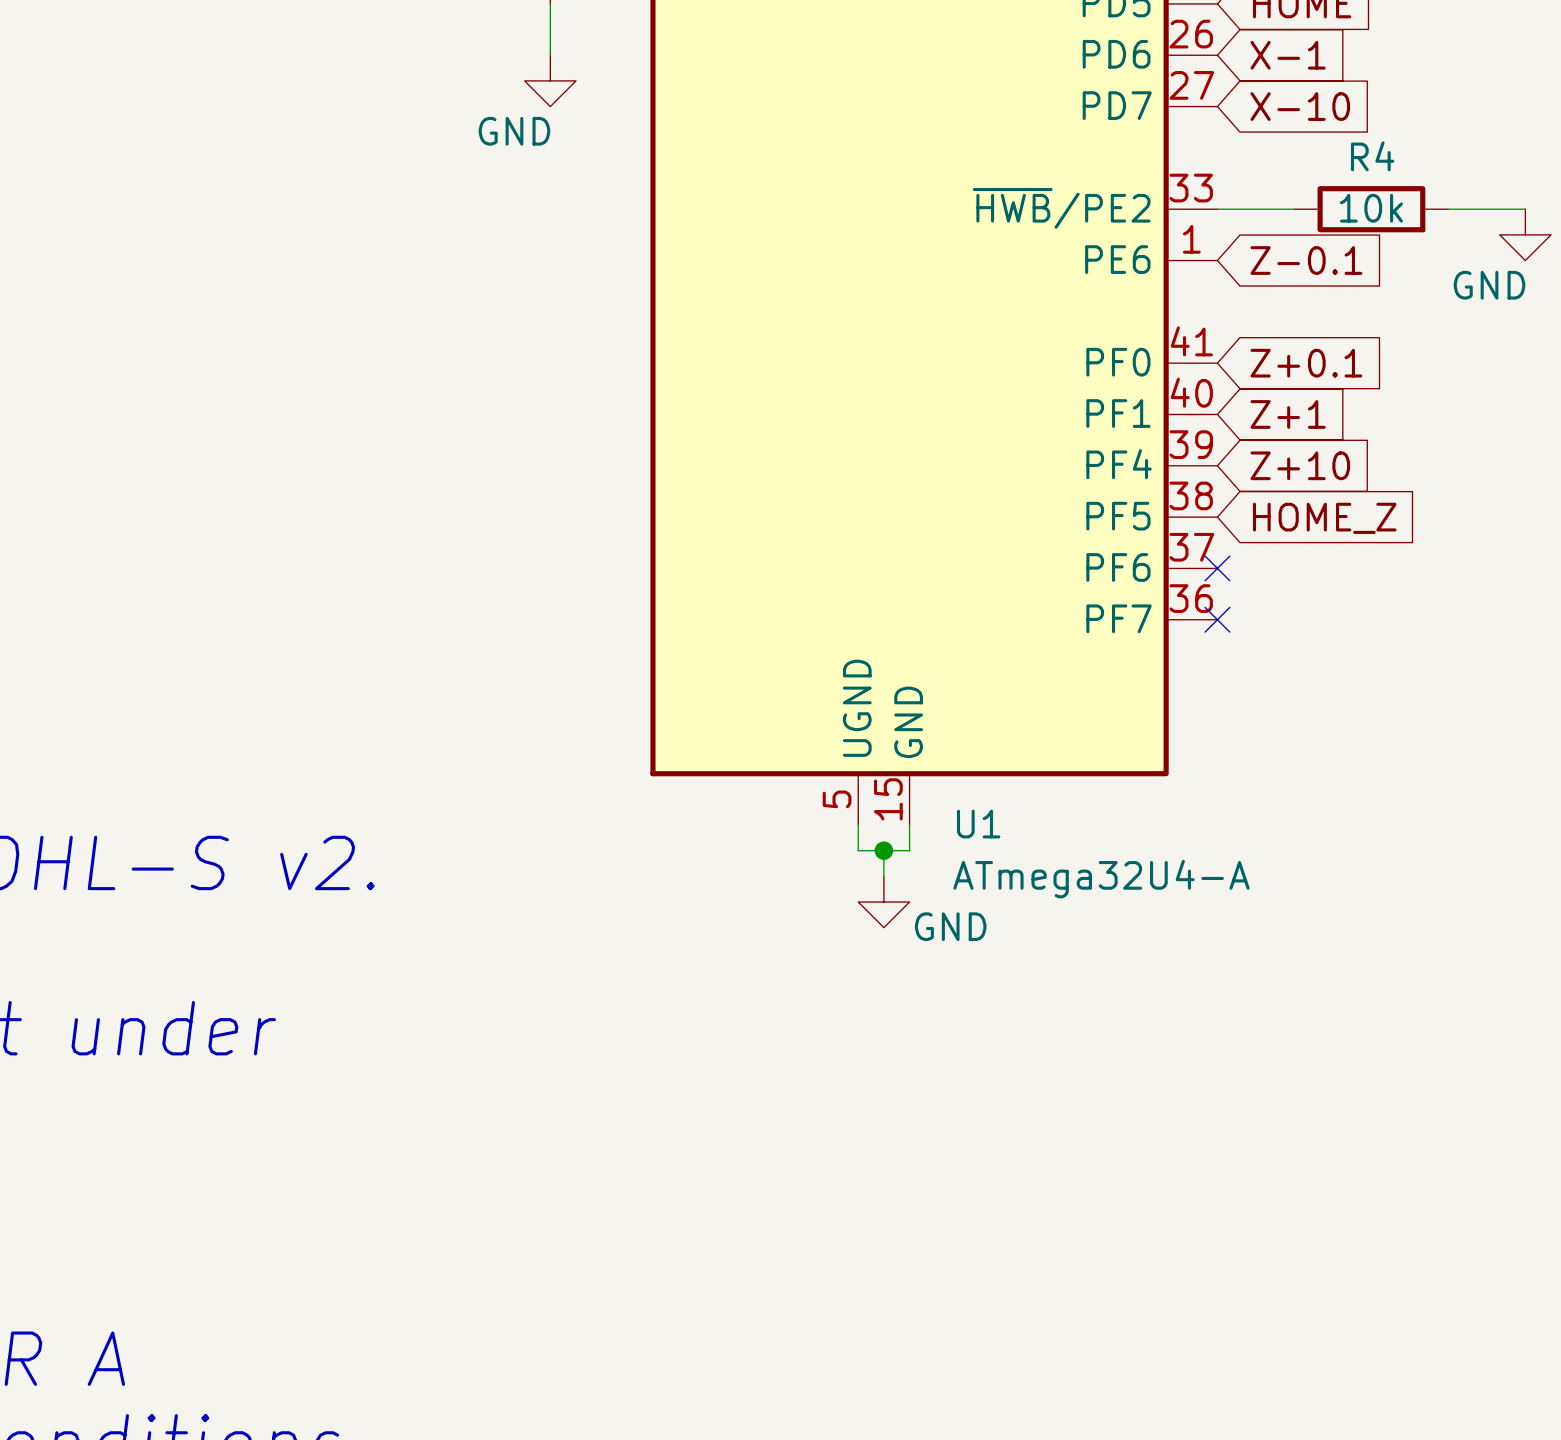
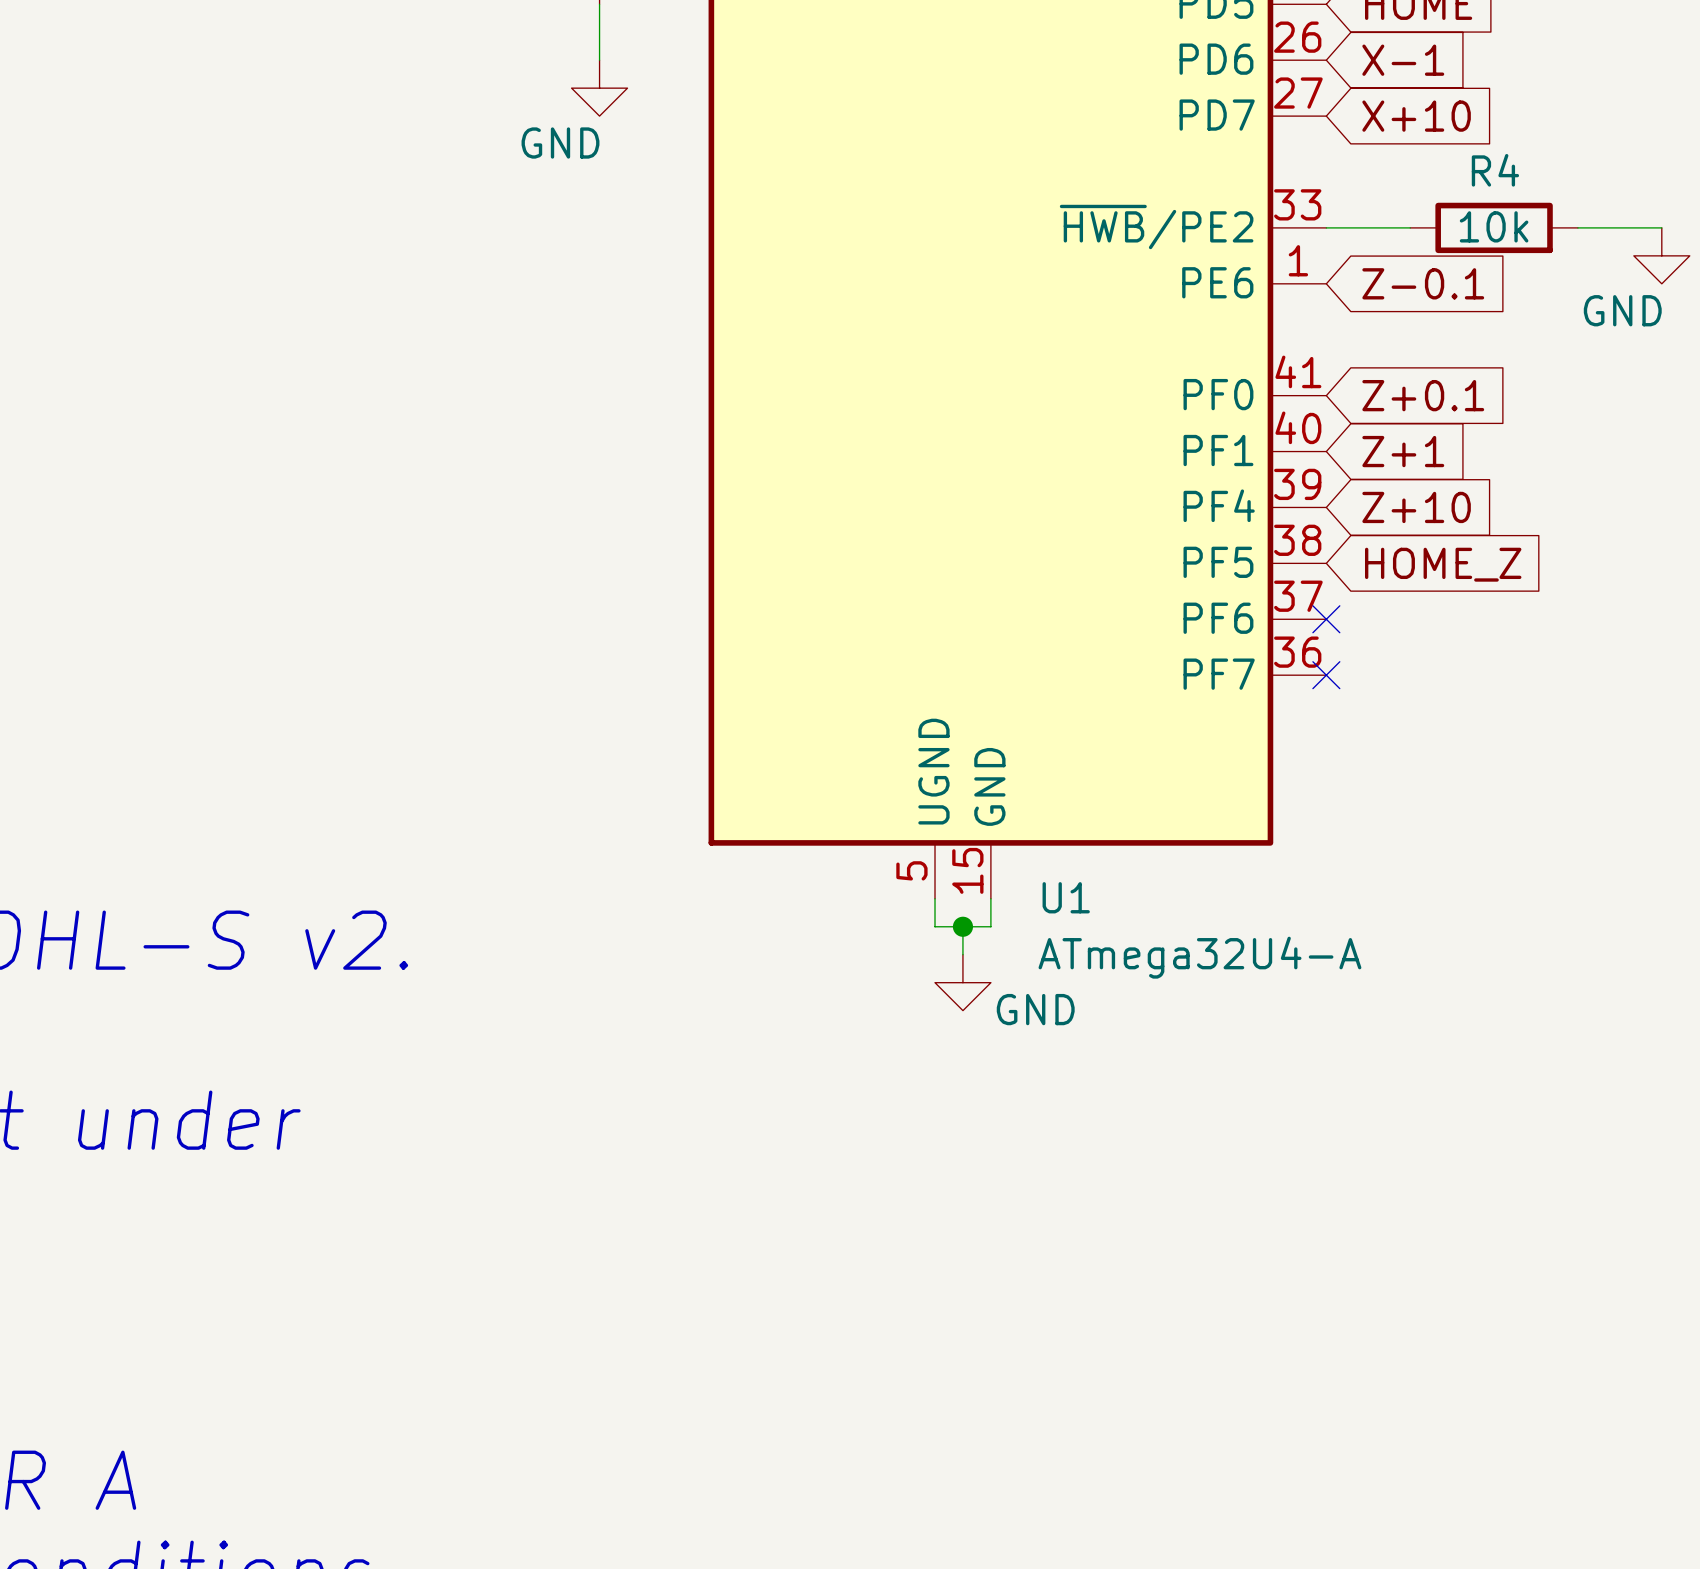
global label: X-10 (1300, 106) -> X+10 (1416, 116)

